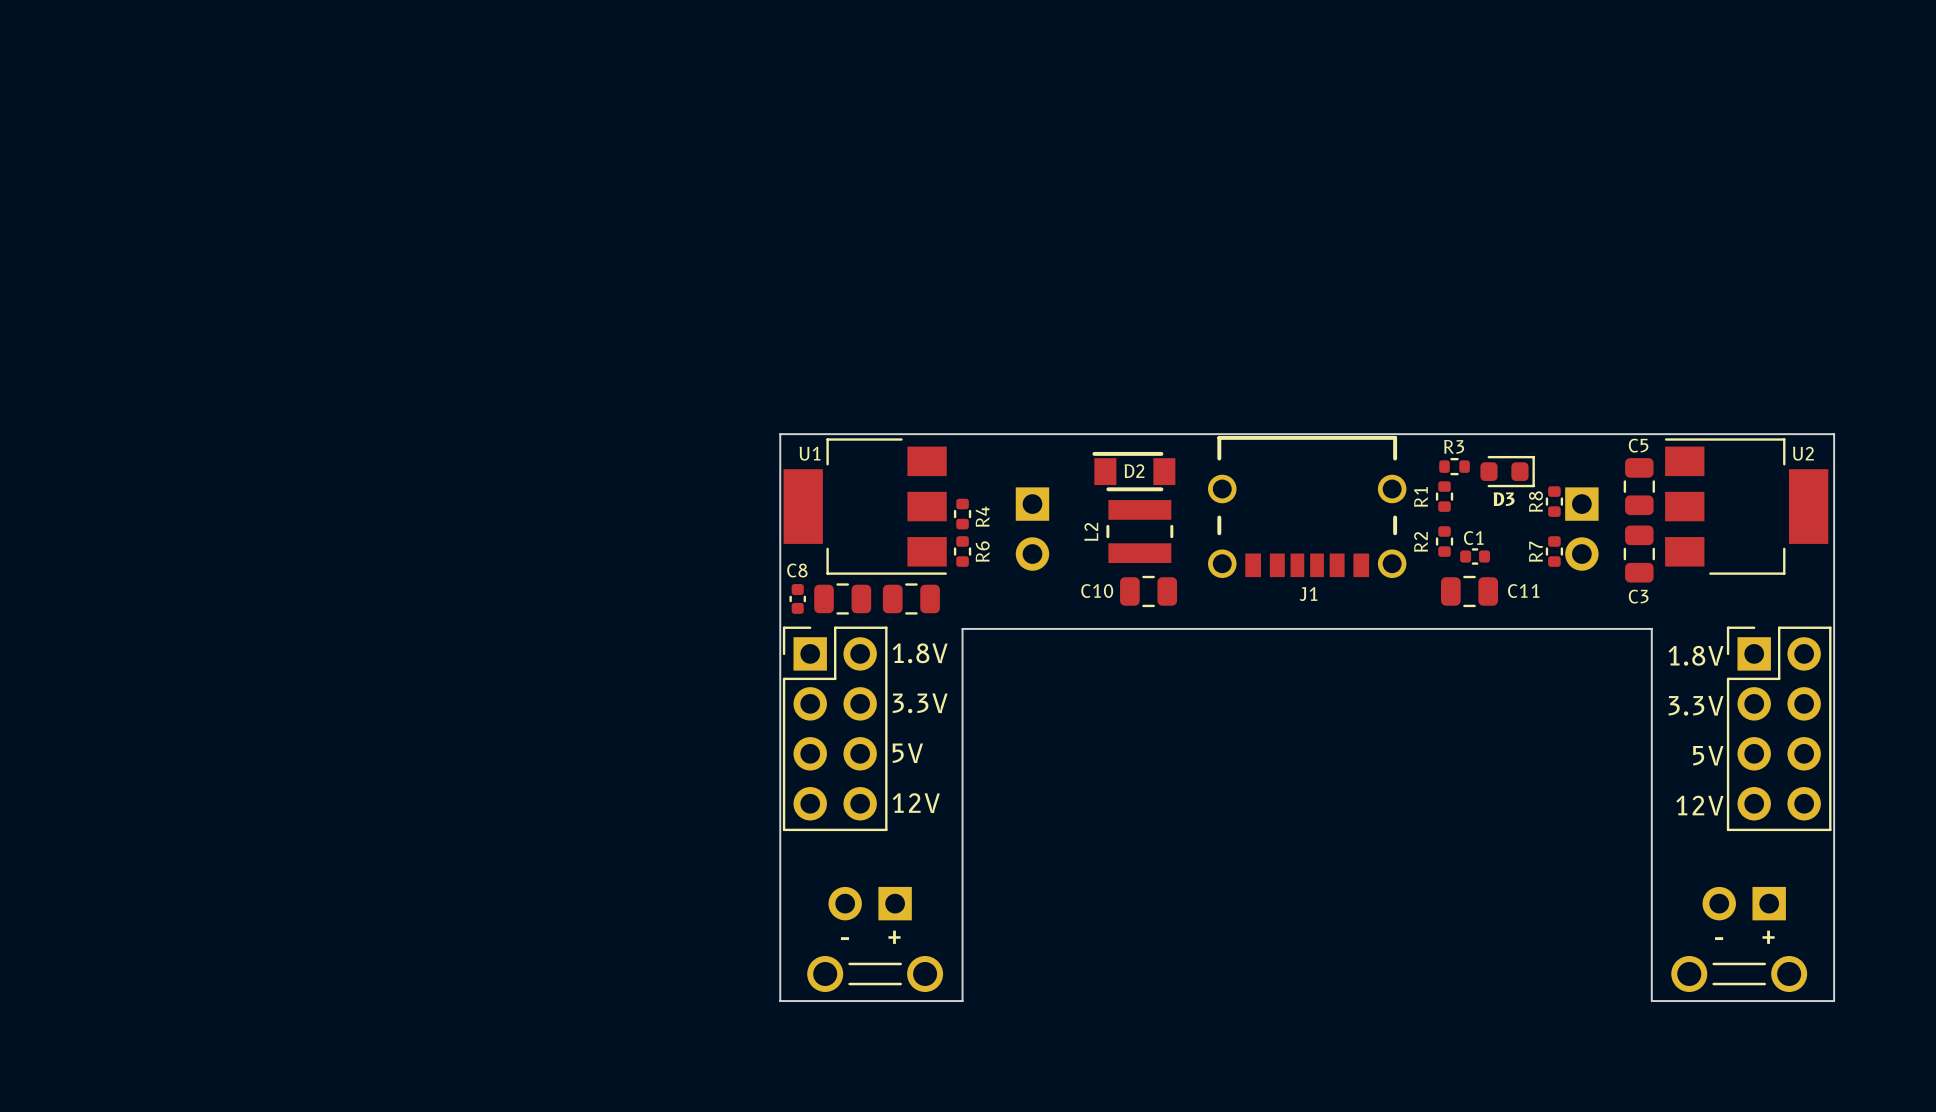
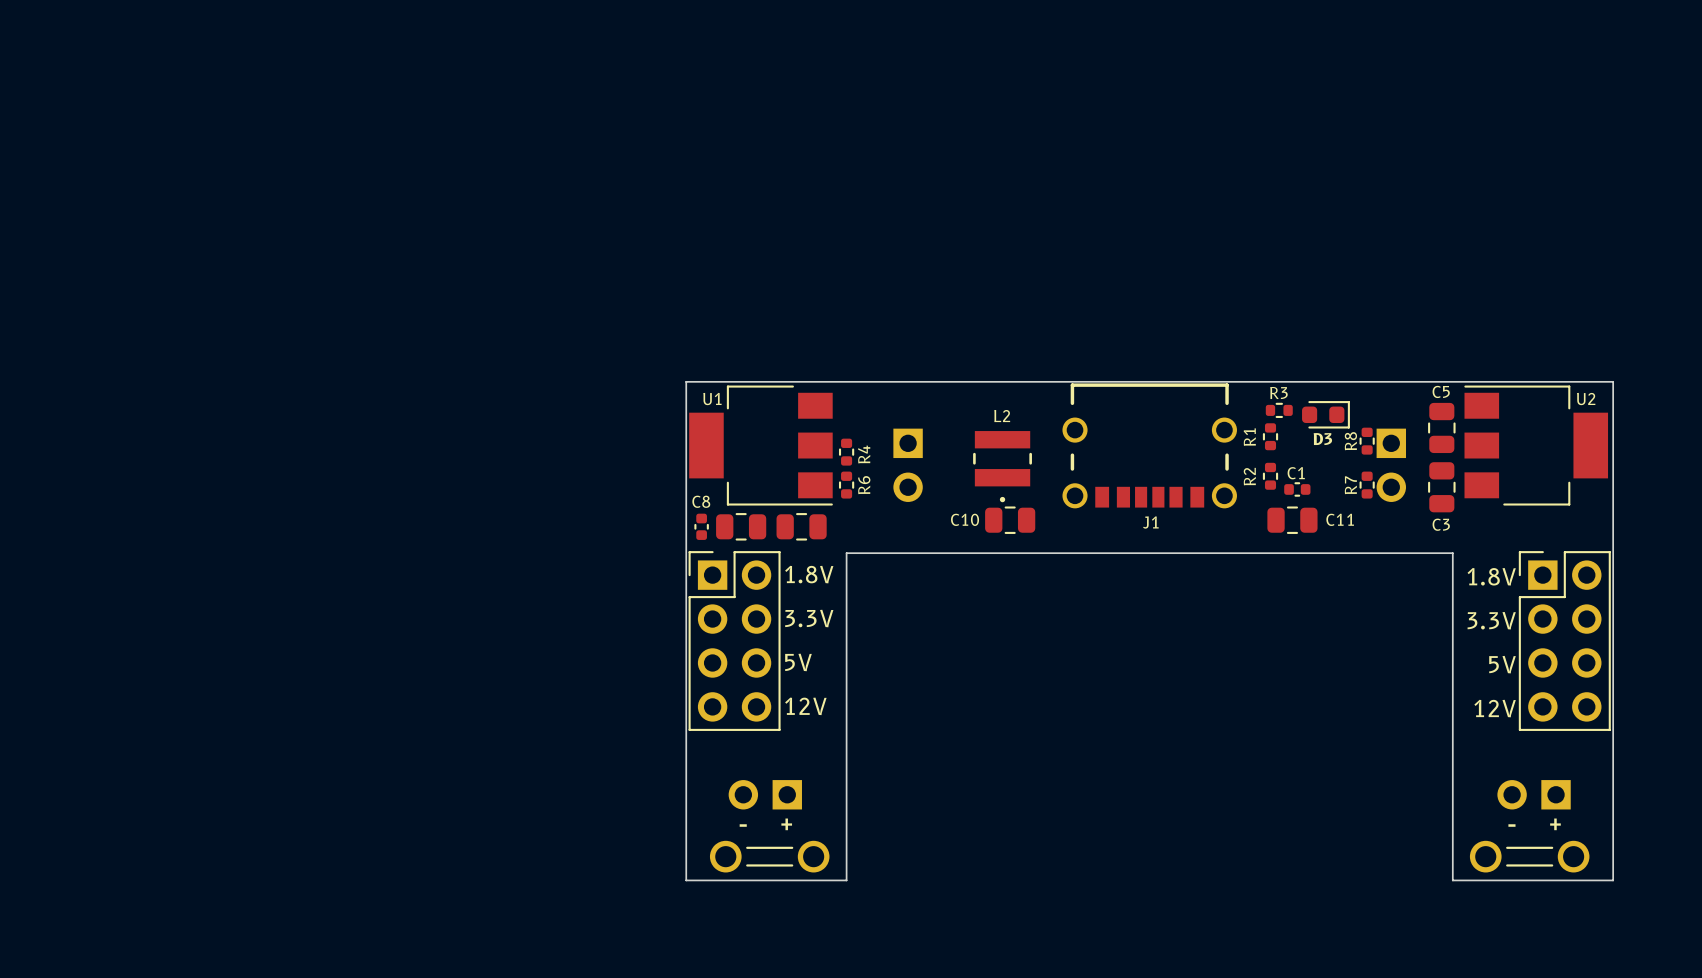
D2: (1133, 471) -> none
L2 footprint: [1106, 500, 1174, 564] -> [973, 431, 1032, 503]
L2 name position: L2 (1091, 531) -> L2 (1002, 416)

